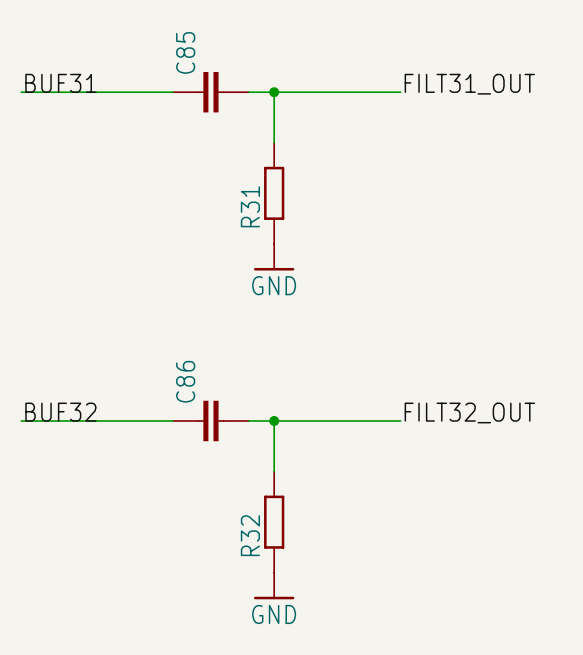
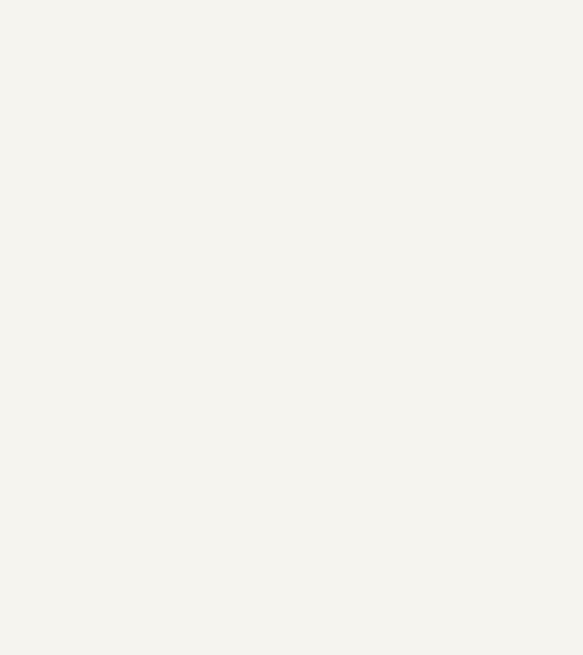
label: BUF31 (60, 83) -> none
label: FILT31_OUT (469, 84) -> none
wire: (21, 92) (173, 92) -> none
C85: (210, 92) -> none
wire: (248, 92) (400, 92) -> none
wire: (274, 92) (274, 142) -> none
junction: (274, 92) -> none
R31: (274, 193) -> none
power symbol: GND (274, 257) -> none
label: BUF32 (60, 412) -> none
label: FILT32_OUT (469, 412) -> none
wire: (21, 420) (173, 420) -> none
C86: (210, 420) -> none
wire: (248, 420) (400, 420) -> none
wire: (274, 420) (274, 471) -> none
junction: (274, 420) -> none
R32: (274, 522) -> none
power symbol: GND (274, 586) -> none

